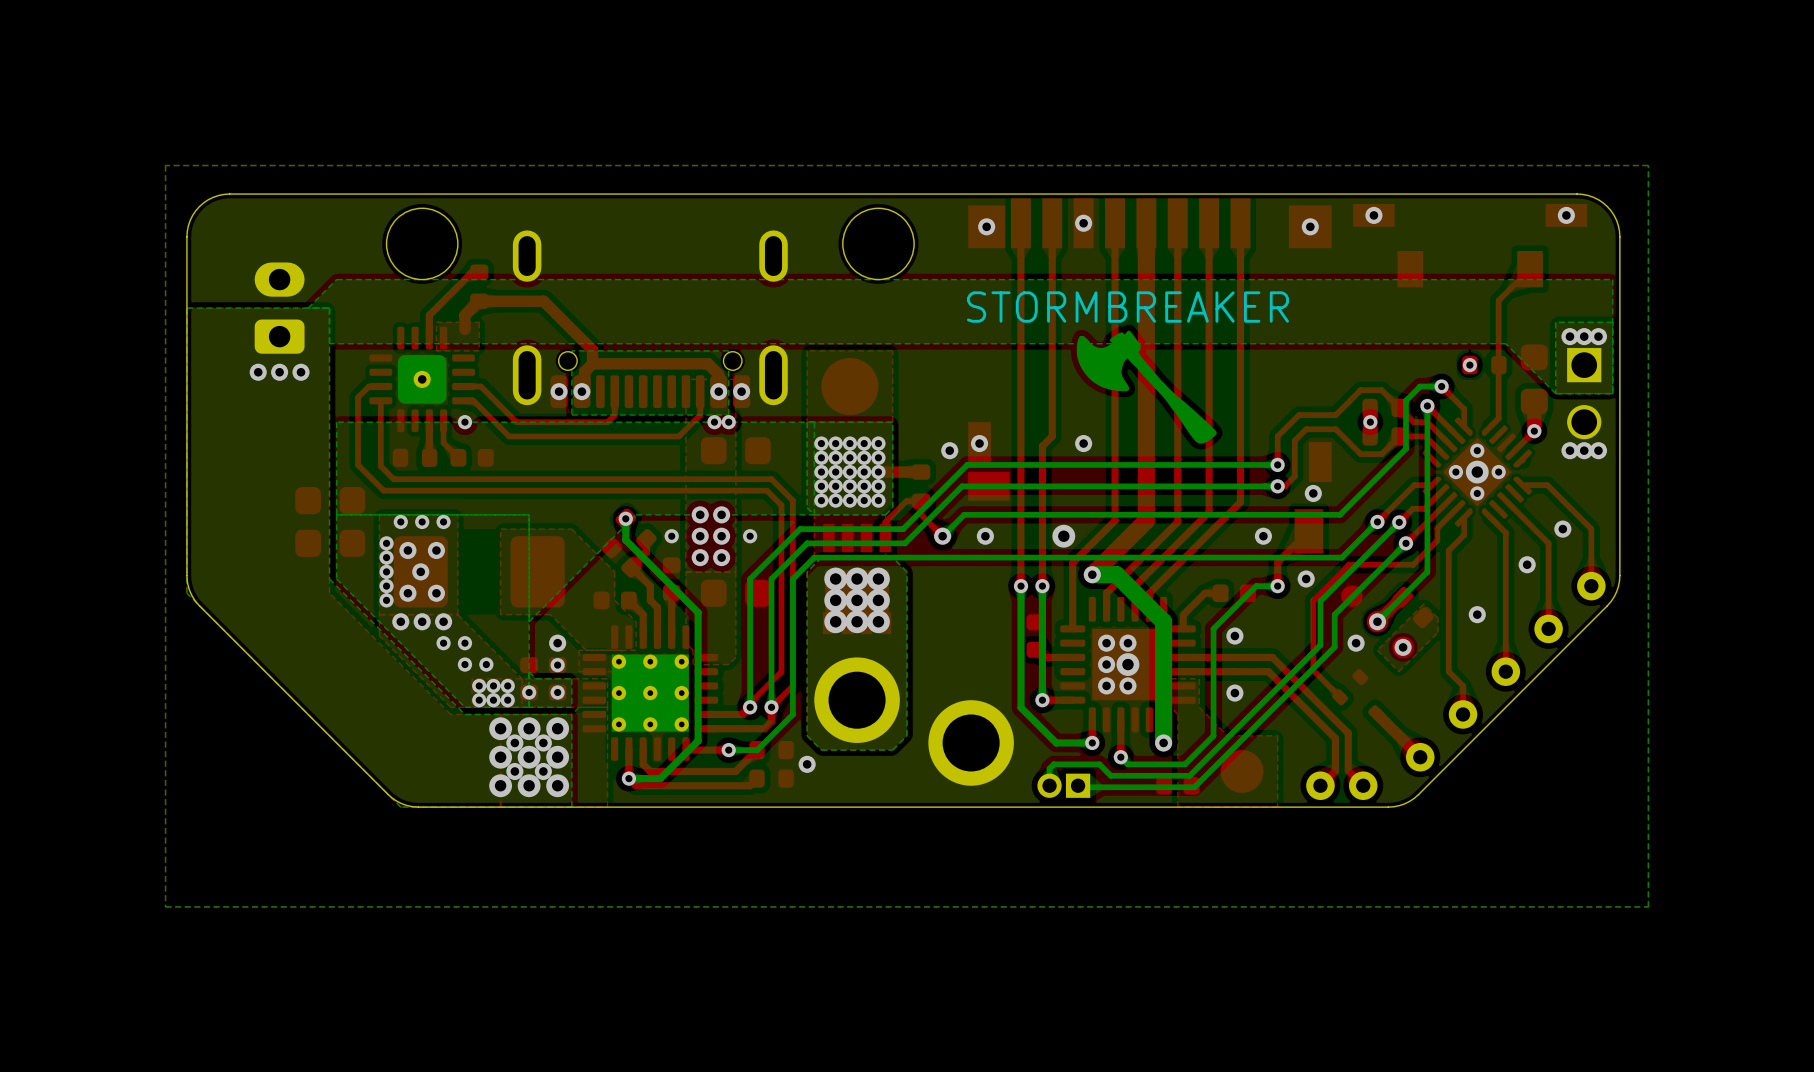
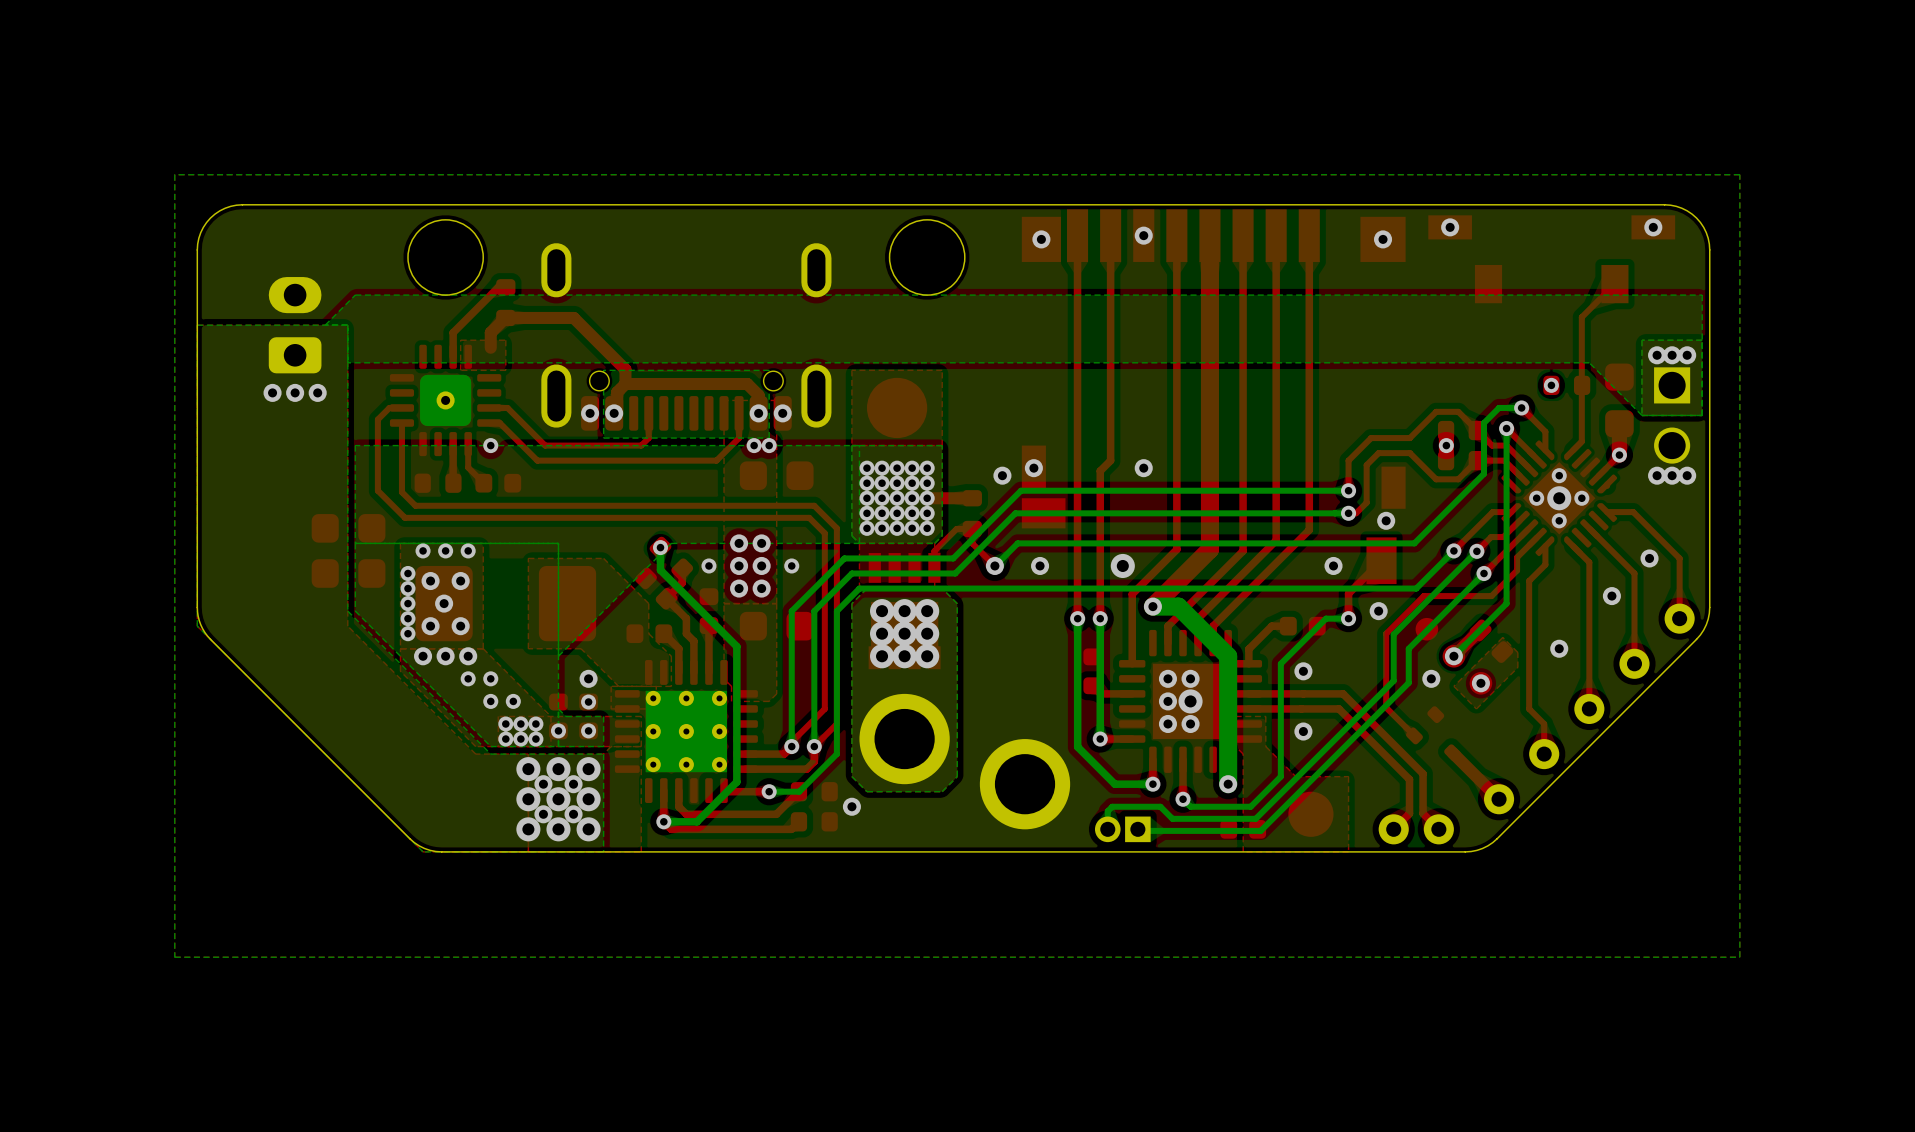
text: STORMBREAKER (1127, 307) -> none
drawing: [1076, 330, 1217, 444] -> none

